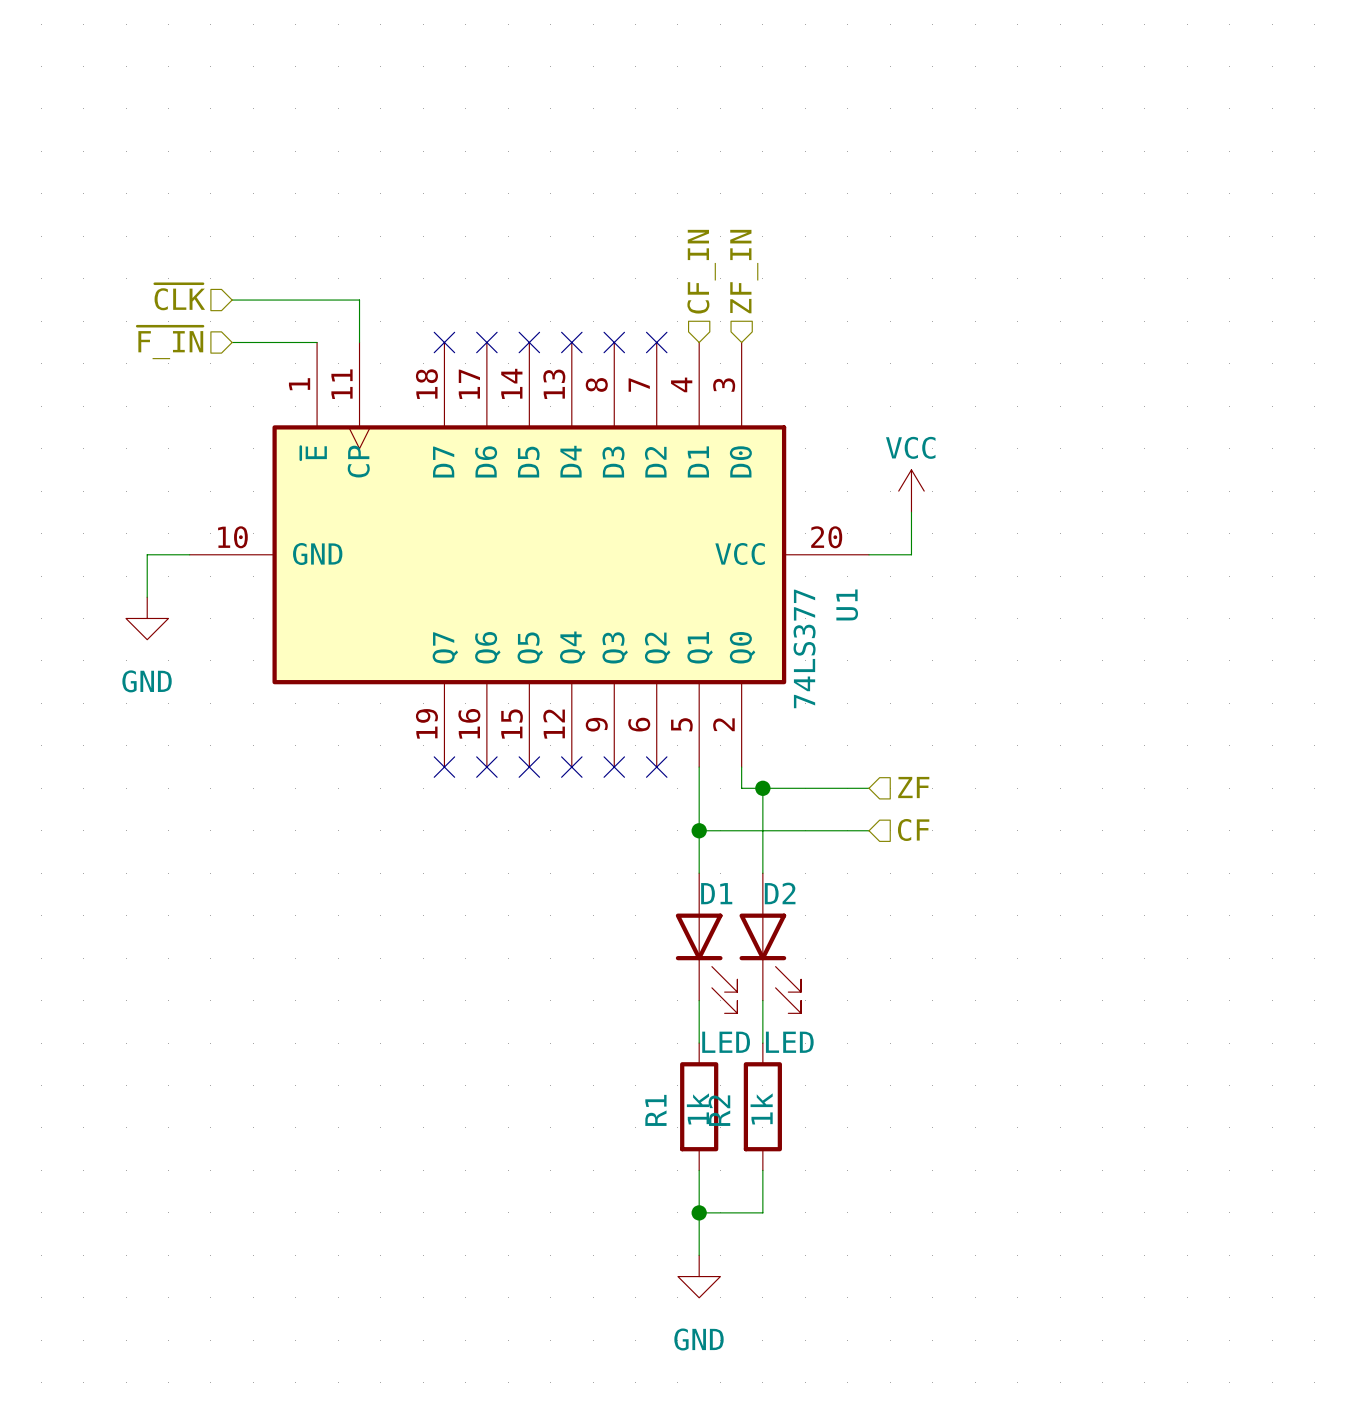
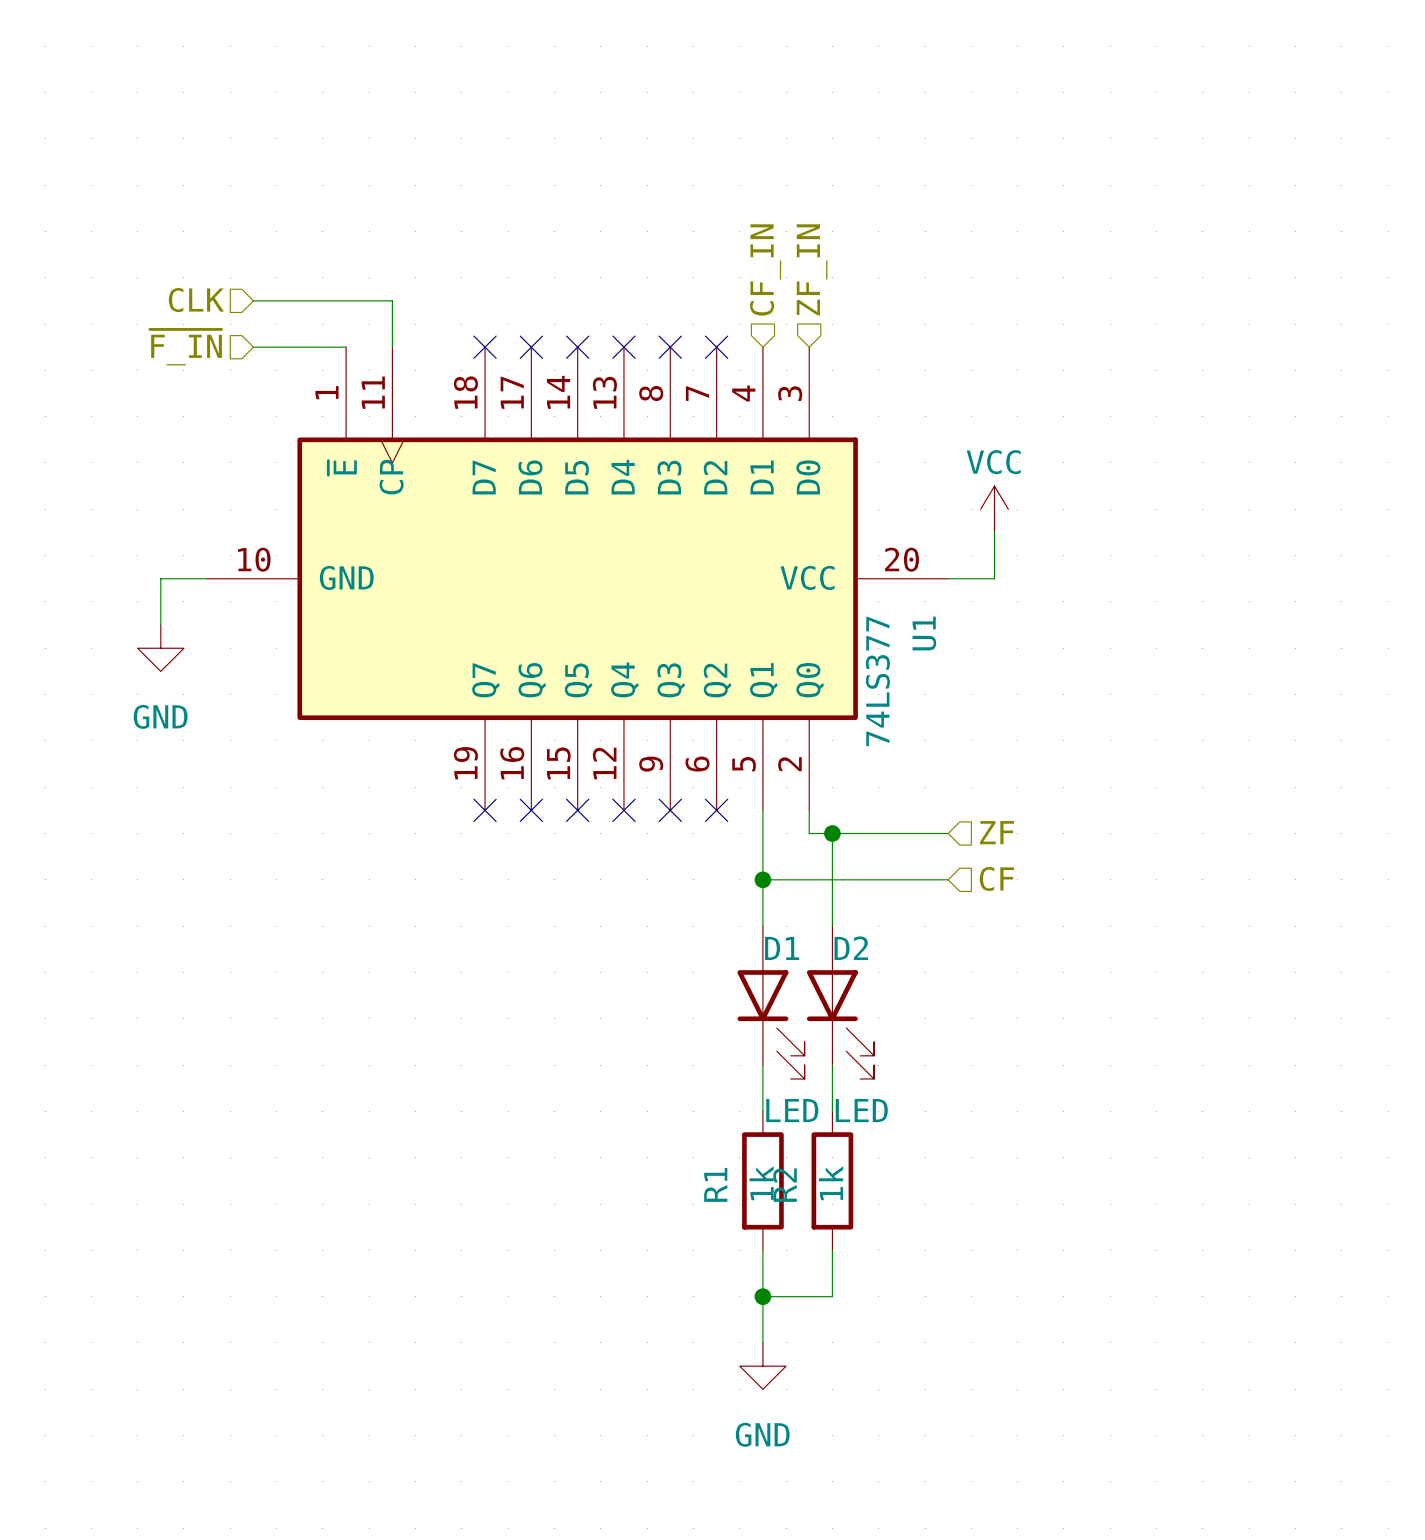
hierarchical label: ~{CLK} (179, 297) -> CLK (196, 300)

